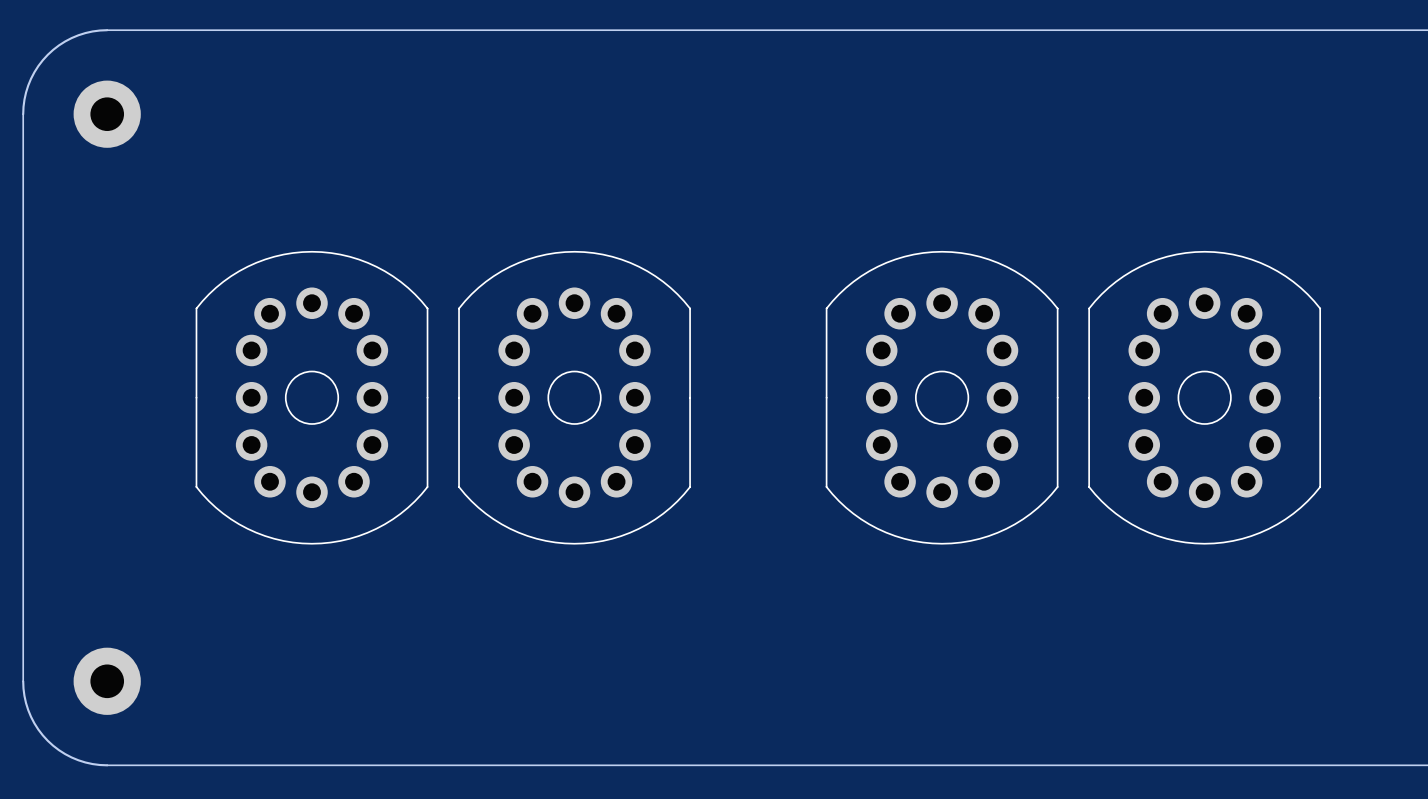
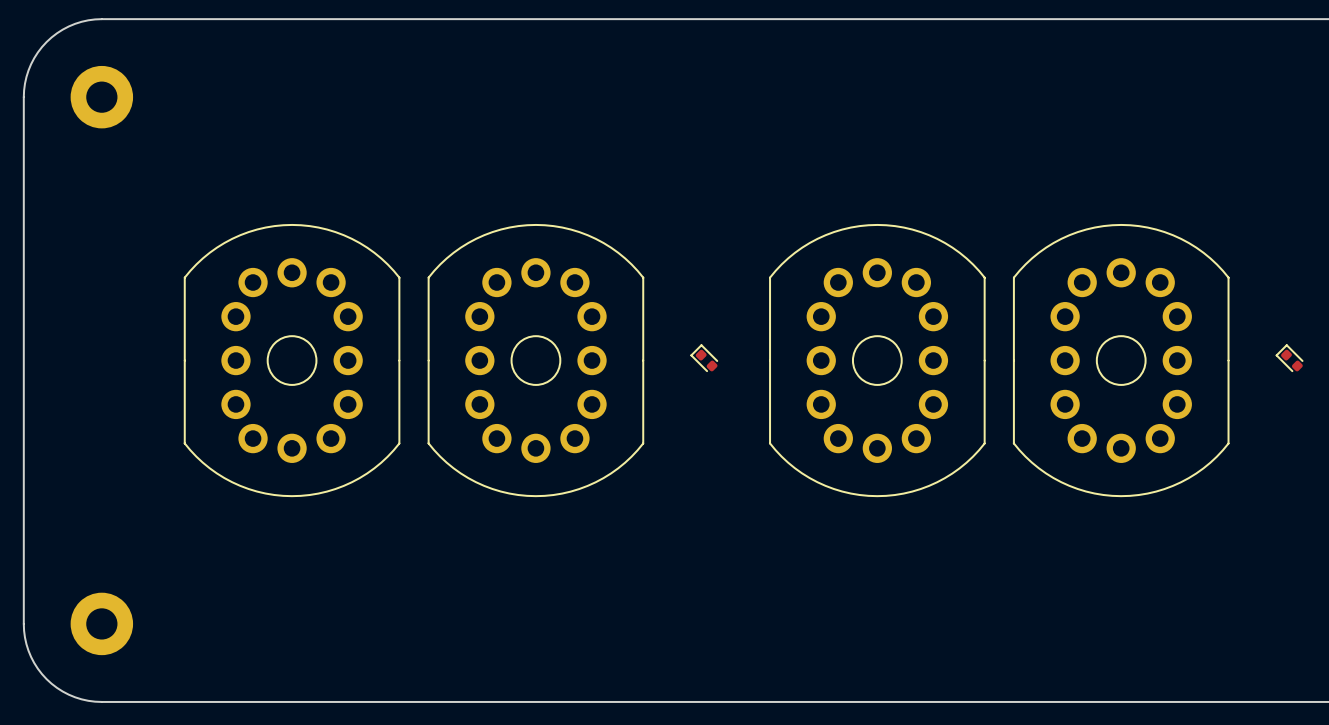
part: none -> (704, 358)
part: none -> (1289, 358)

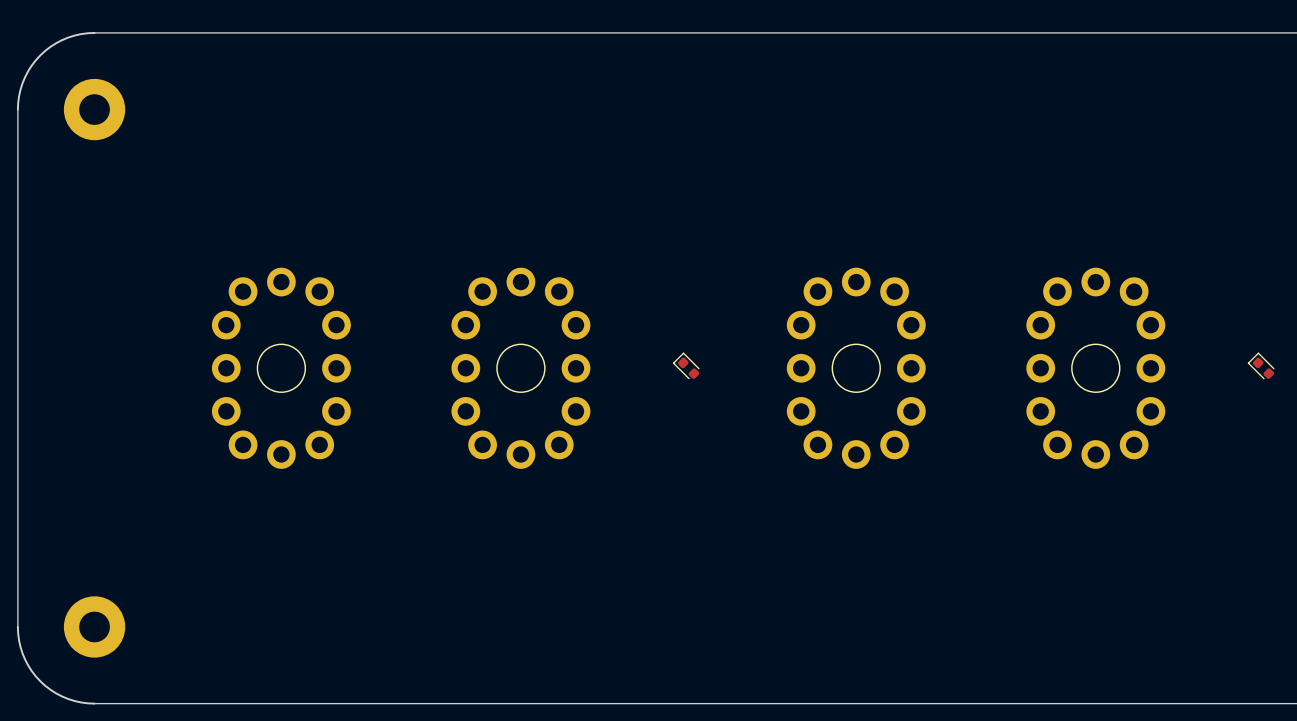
part footprint: [183, 224, 401, 497] -> [211, 267, 351, 469]
part footprint: [427, 224, 645, 497] -> [451, 267, 591, 469]
part footprint: [769, 224, 986, 497] -> [786, 267, 926, 469]
part footprint: [1013, 224, 1230, 497] -> [1026, 267, 1166, 469]

